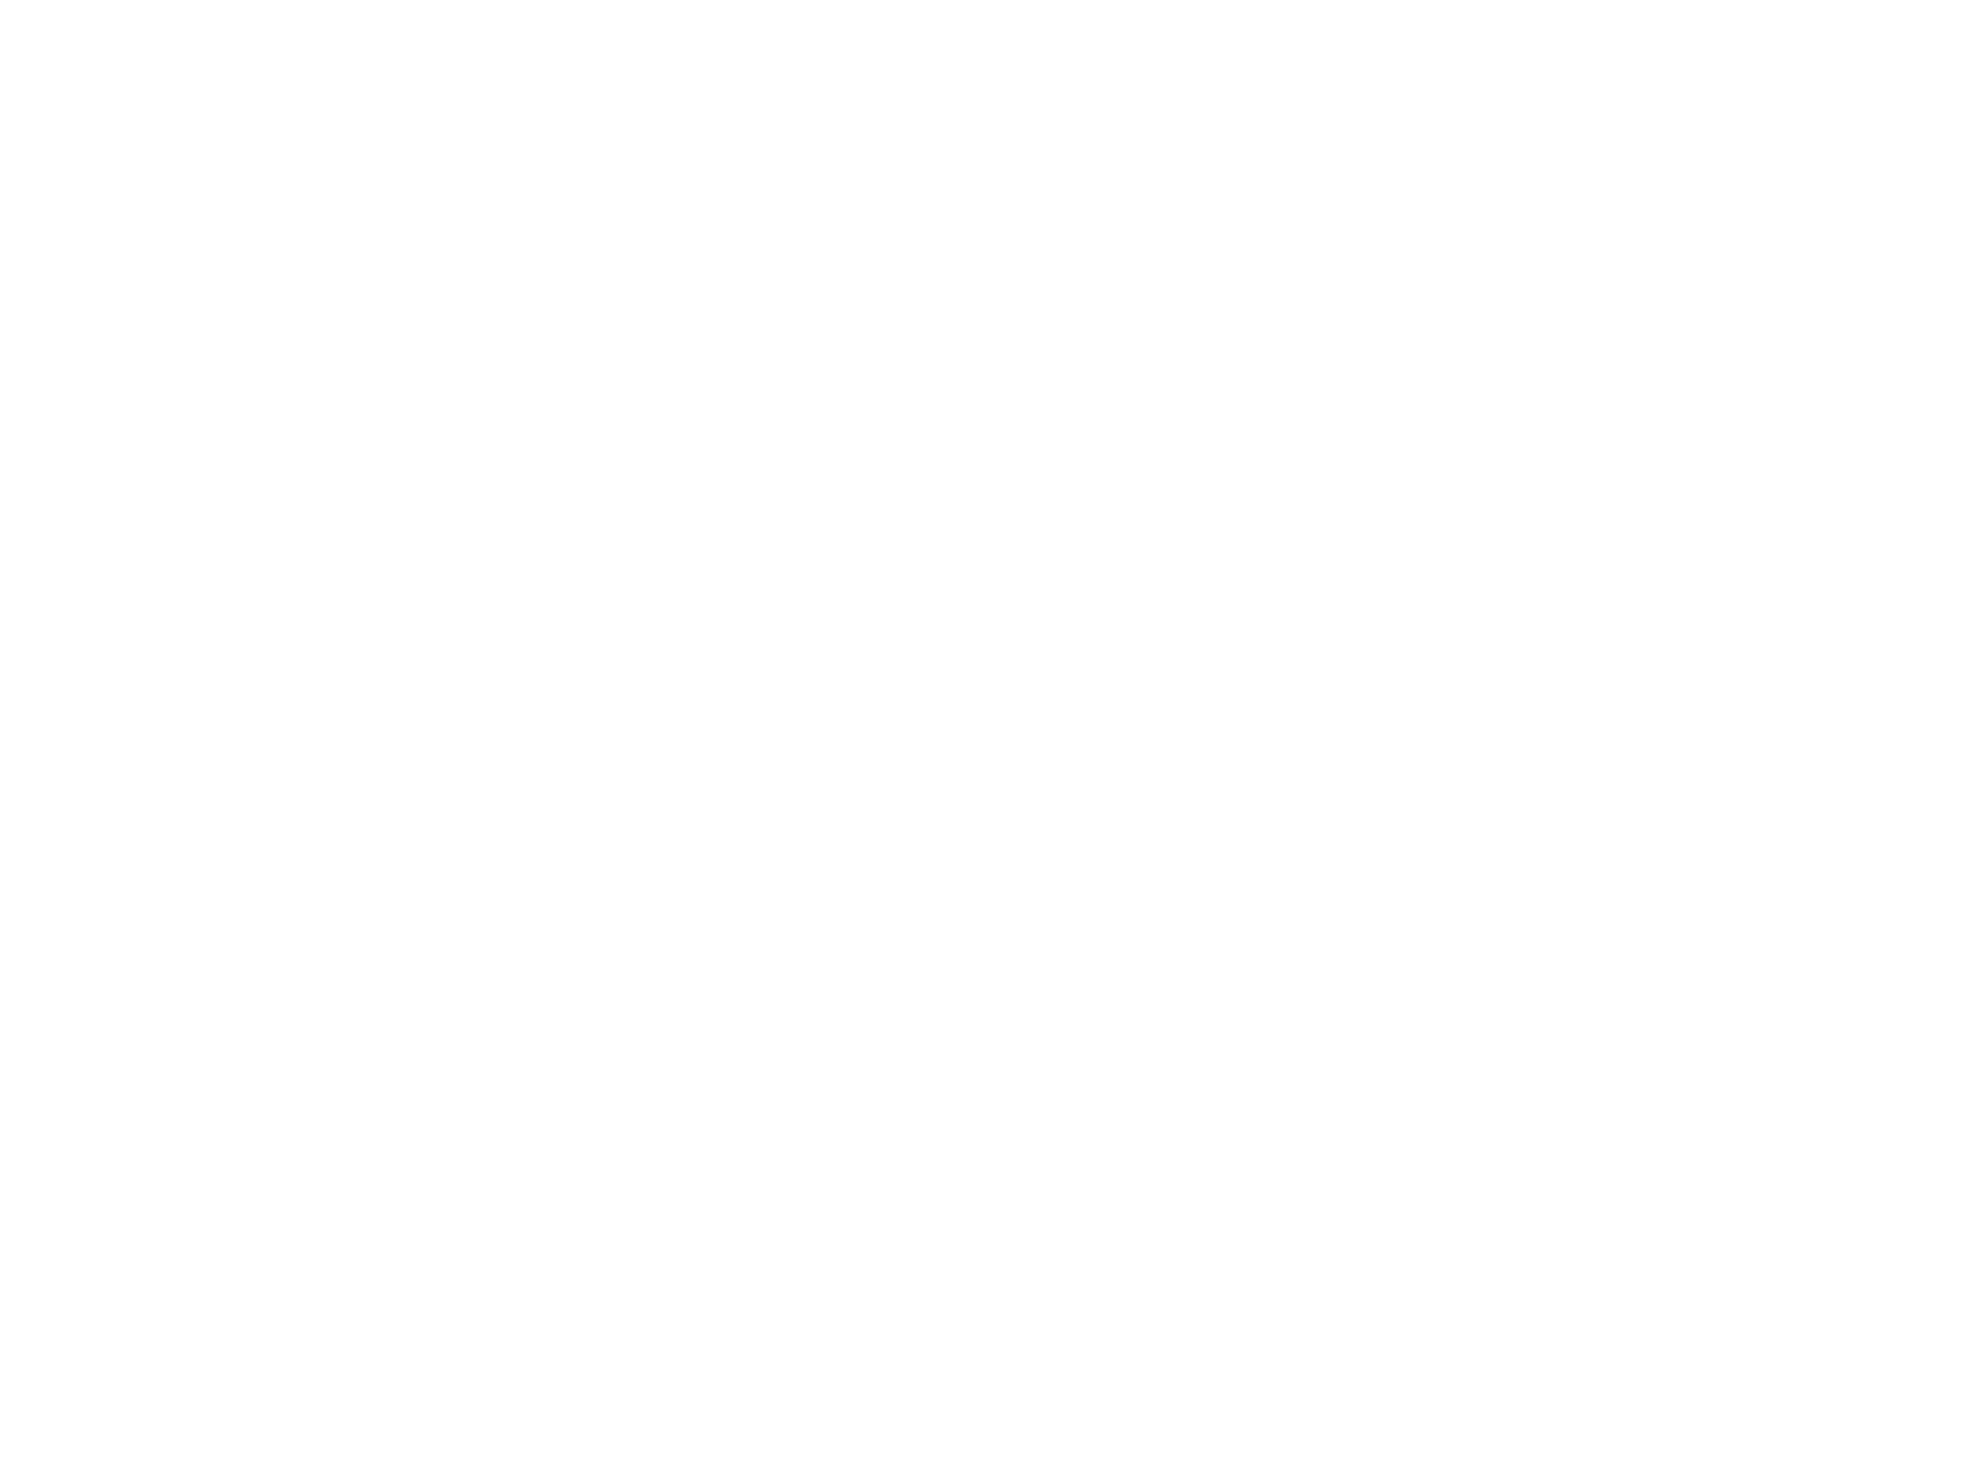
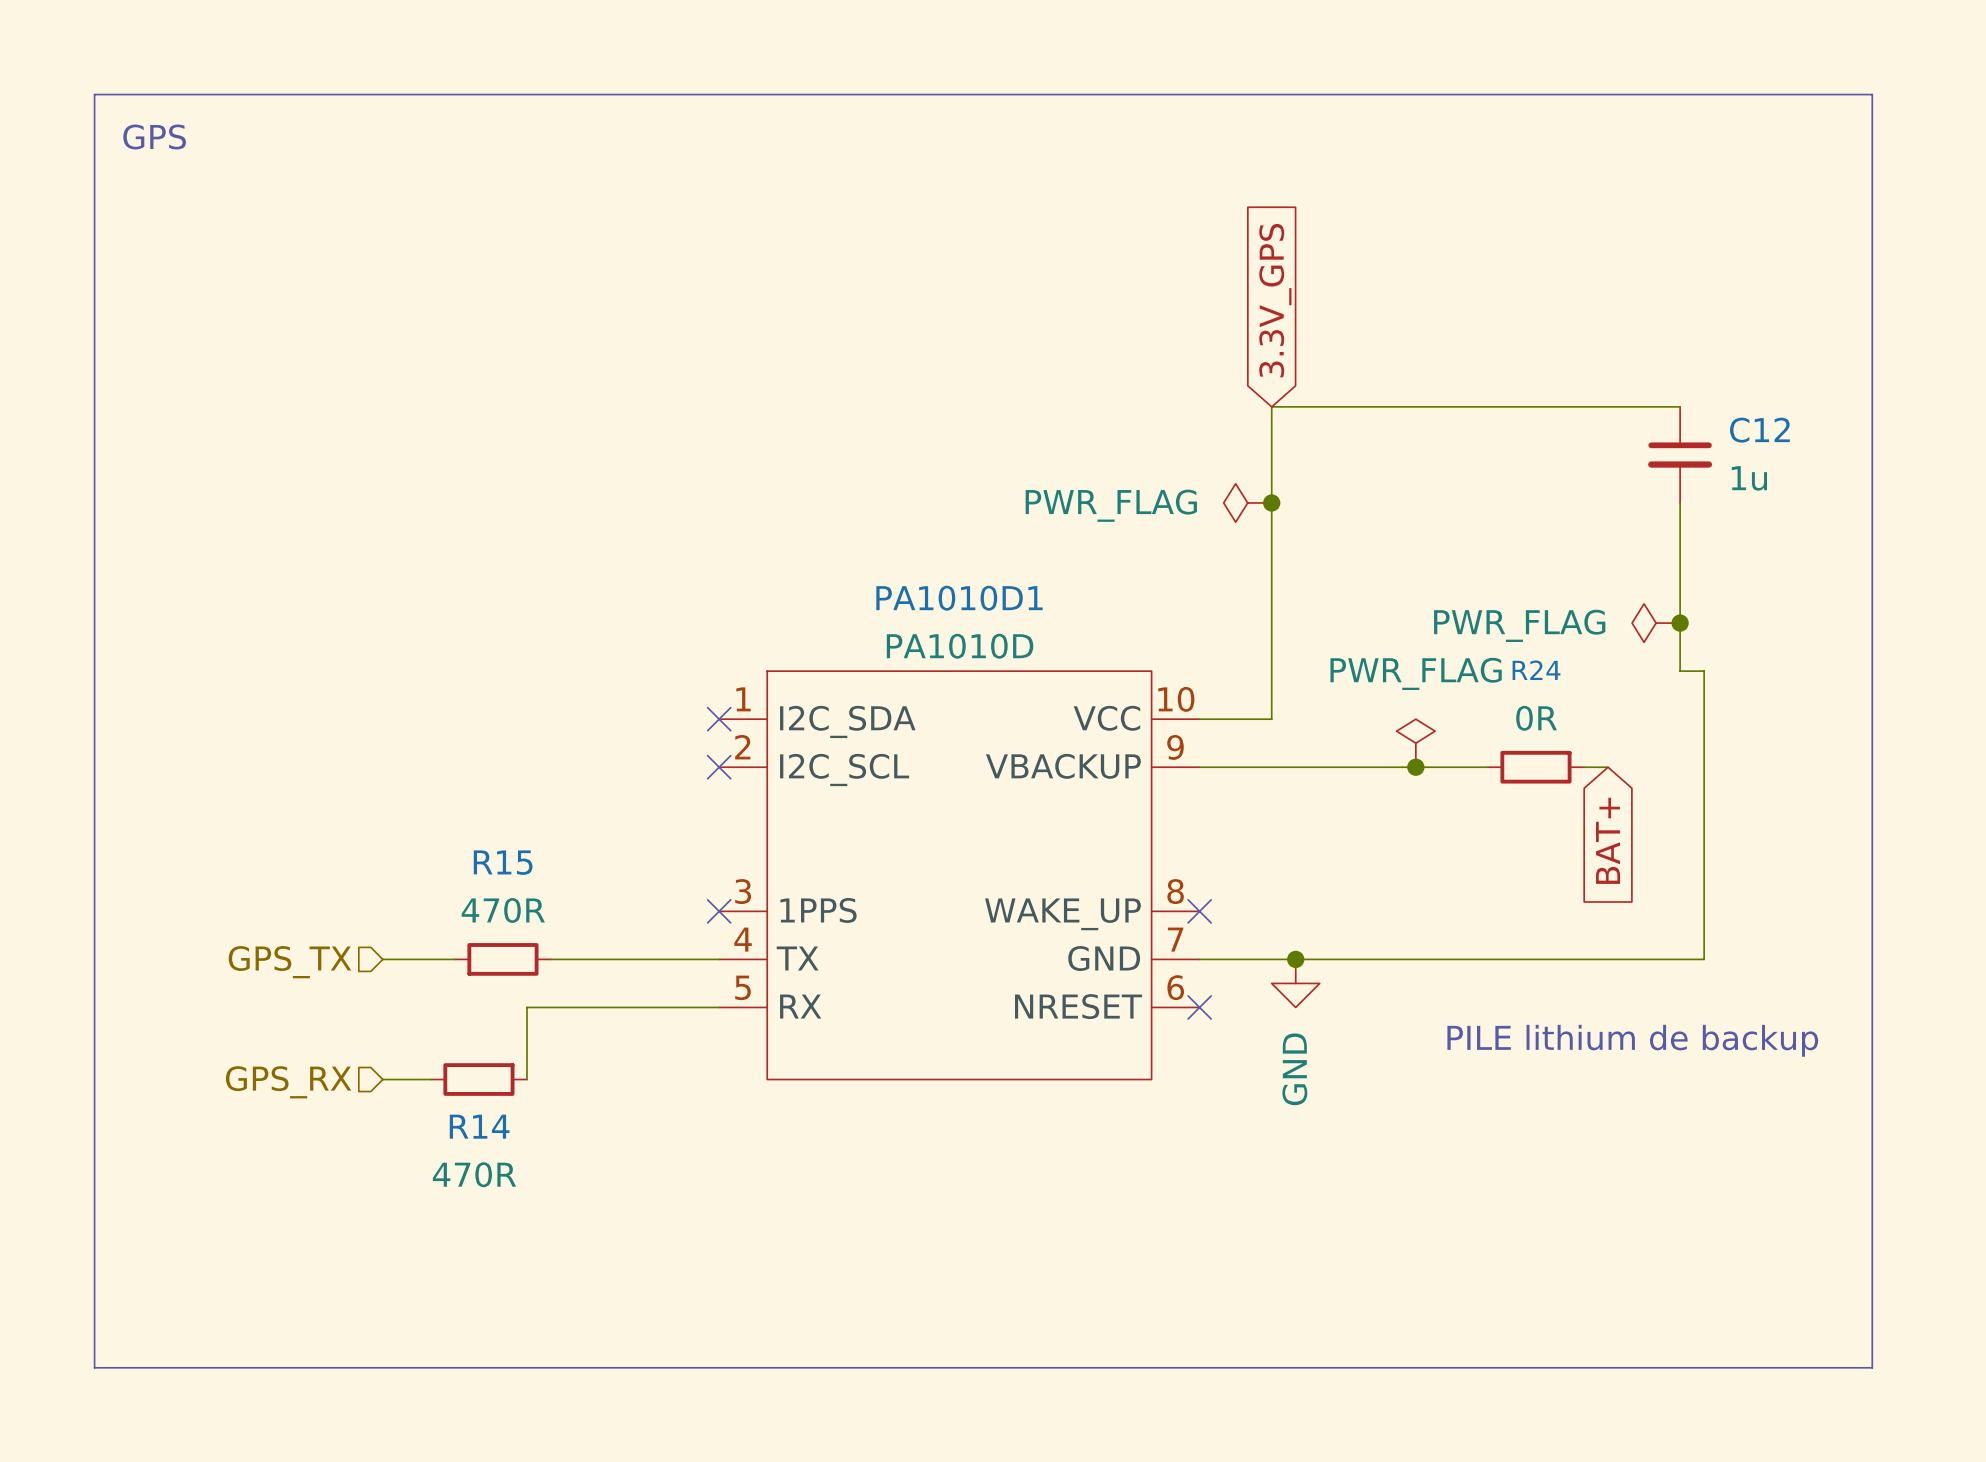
line: none -> (94, 94) (1872, 94) (1872, 1367) (94, 1367) (94, 94)
text: none -> GPS (154, 137)
global label: none -> 3.3V_GPS (1275, 300)
wire: none -> (1680, 406) (1271, 406) (1271, 719) (1199, 719)
C12: none -> 1u (1680, 454)
power symbol: none -> PWR_FLAG (1247, 502)
junction: none -> (1271, 502)
wire: none -> (1680, 502) (1680, 671) (1704, 671) (1704, 959) (1199, 959)
power symbol: none -> PWR_FLAG (1656, 623)
junction: none -> (1680, 623)
no-connect mark: none -> (719, 719)
power symbol: none -> PWR_FLAG (1415, 743)
no-connect mark: none -> (719, 767)
wire: none -> (1199, 767) (1487, 767)
junction: none -> (1415, 767)
R24: none -> 0R (1535, 767)
wire: none -> (1584, 767) (1608, 767)
global label: none -> BAT+ (1608, 840)
PA1010D1: none -> PA1010D (959, 875)
no-connect mark: none -> (719, 911)
no-connect mark: none -> (1199, 911)
wire: none -> (382, 959) (454, 959)
R15: none -> 470R (502, 959)
wire: none -> (551, 959) (719, 959)
junction: none -> (1295, 959)
hierarchical label: none -> GPS_TX (290, 962)
power symbol: none -> GND (1295, 983)
wire: none -> (719, 1007) (526, 1007) (526, 1079)
no-connect mark: none -> (1199, 1007)
text: none -> PILE lithium de backup (1632, 1040)
wire: none -> (382, 1079) (430, 1079)
R14: none -> 470R (478, 1079)
hierarchical label: none -> GPS_RX (288, 1082)

